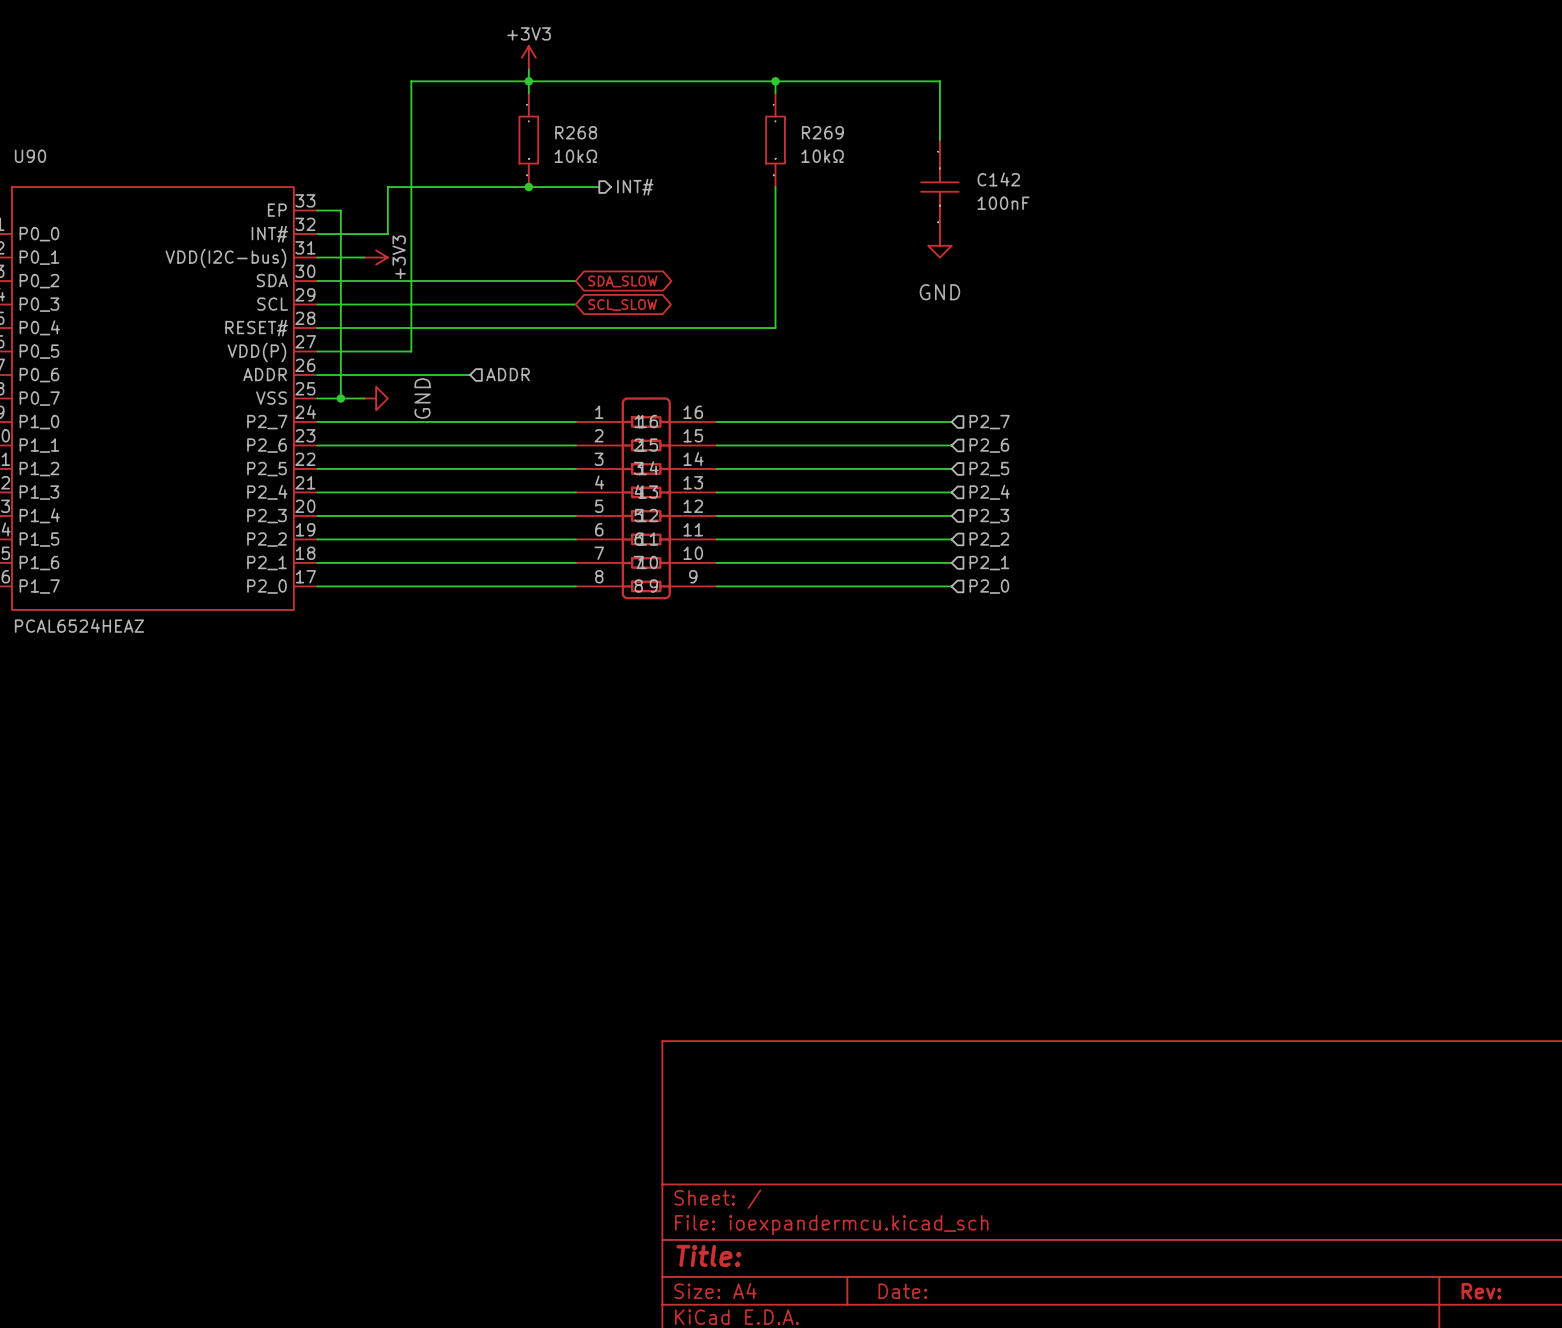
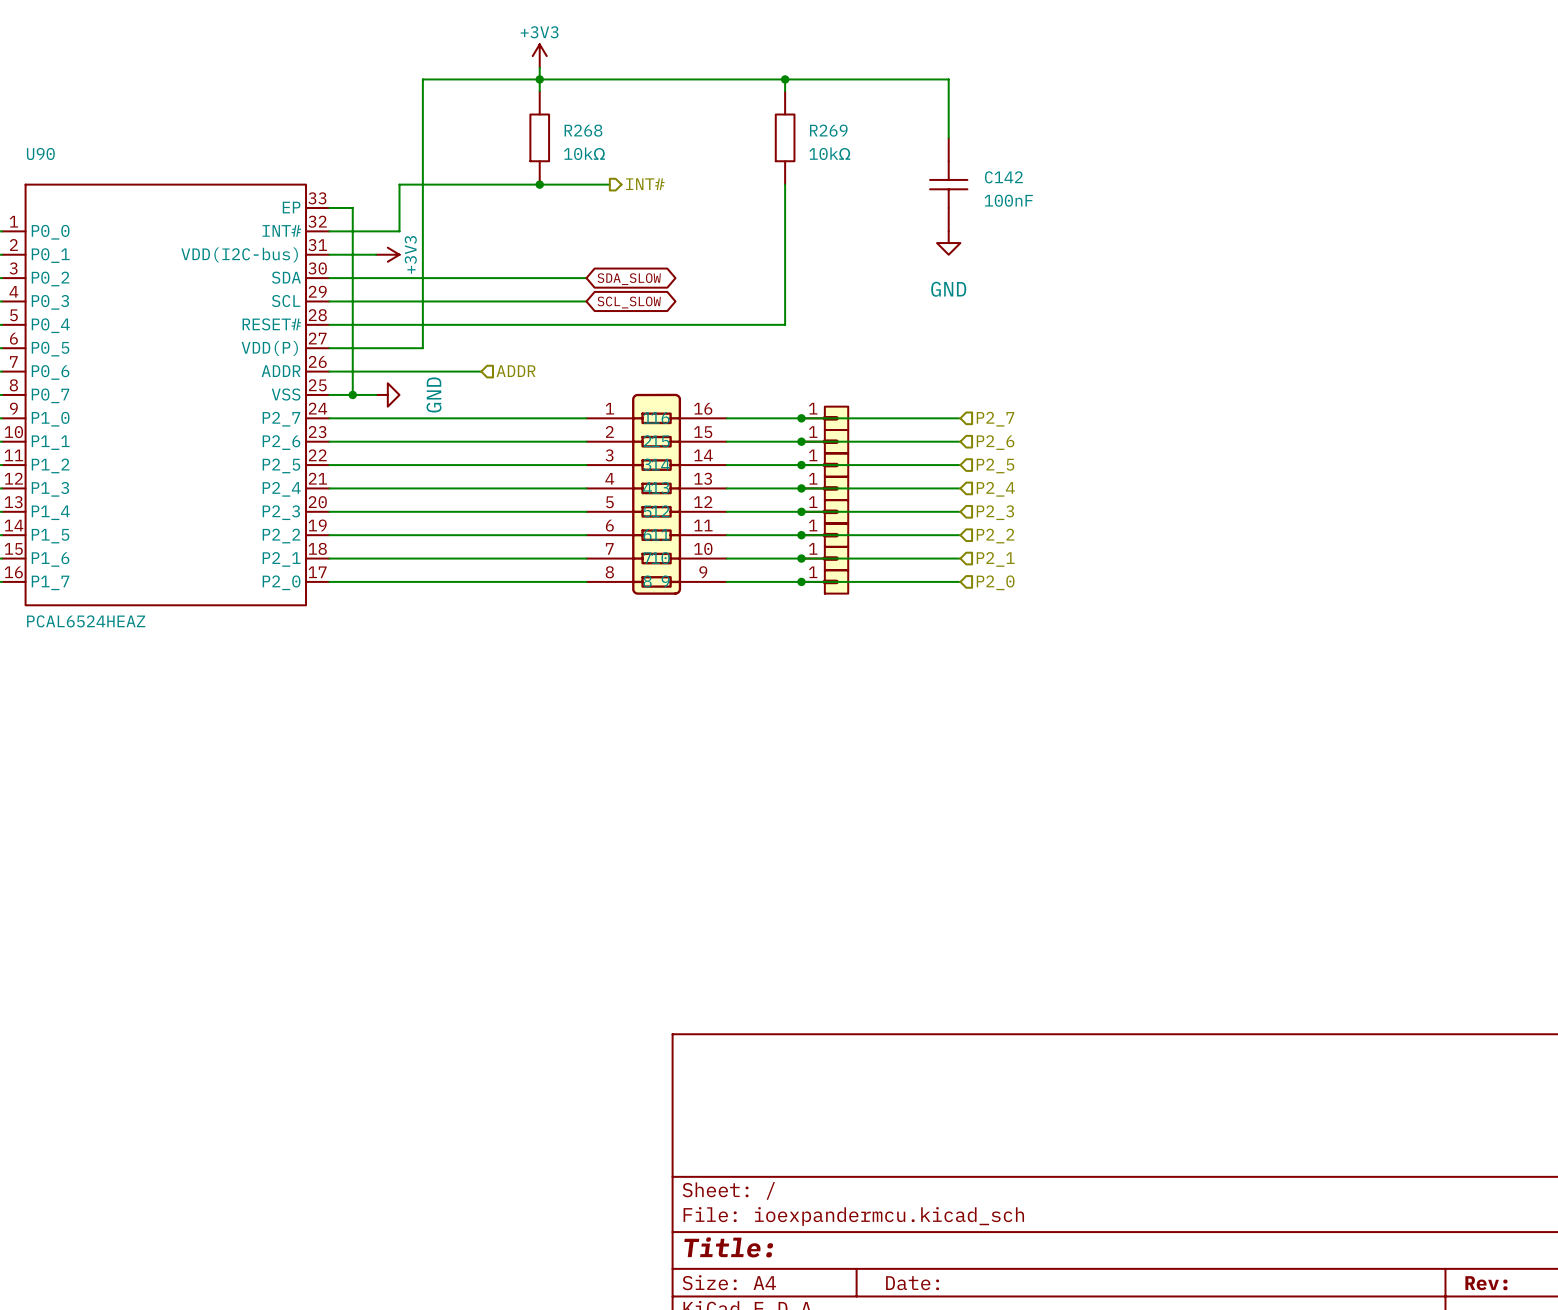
junction: none -> (801, 418)
part: none -> (824, 418)
junction: none -> (801, 441)
part: none -> (824, 441)
junction: none -> (801, 465)
part: none -> (824, 465)
junction: none -> (801, 488)
part: none -> (824, 488)
junction: none -> (801, 511)
part: none -> (824, 511)
junction: none -> (801, 535)
part: none -> (824, 535)
junction: none -> (801, 558)
part: none -> (824, 558)
junction: none -> (801, 581)
part: none -> (824, 581)

